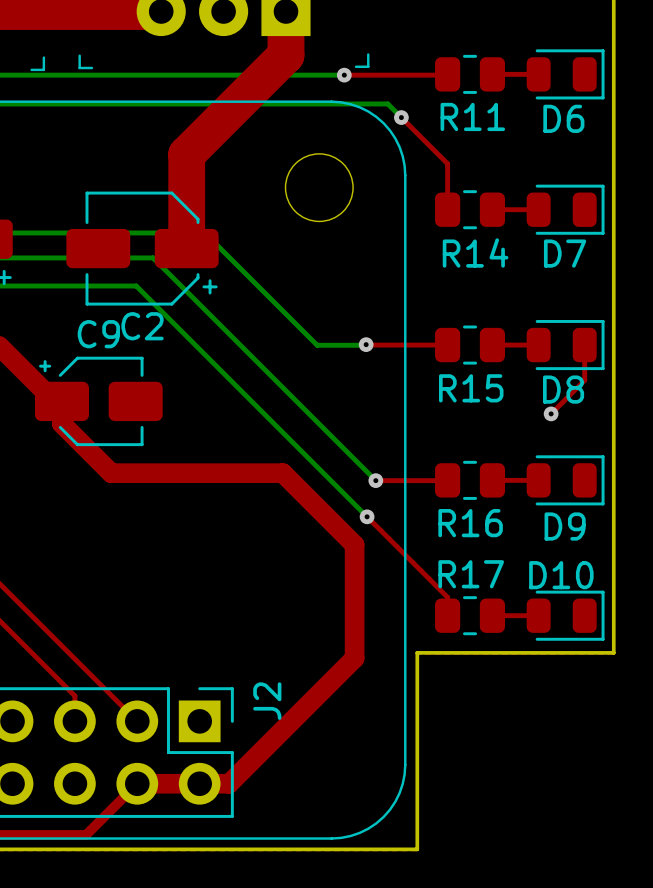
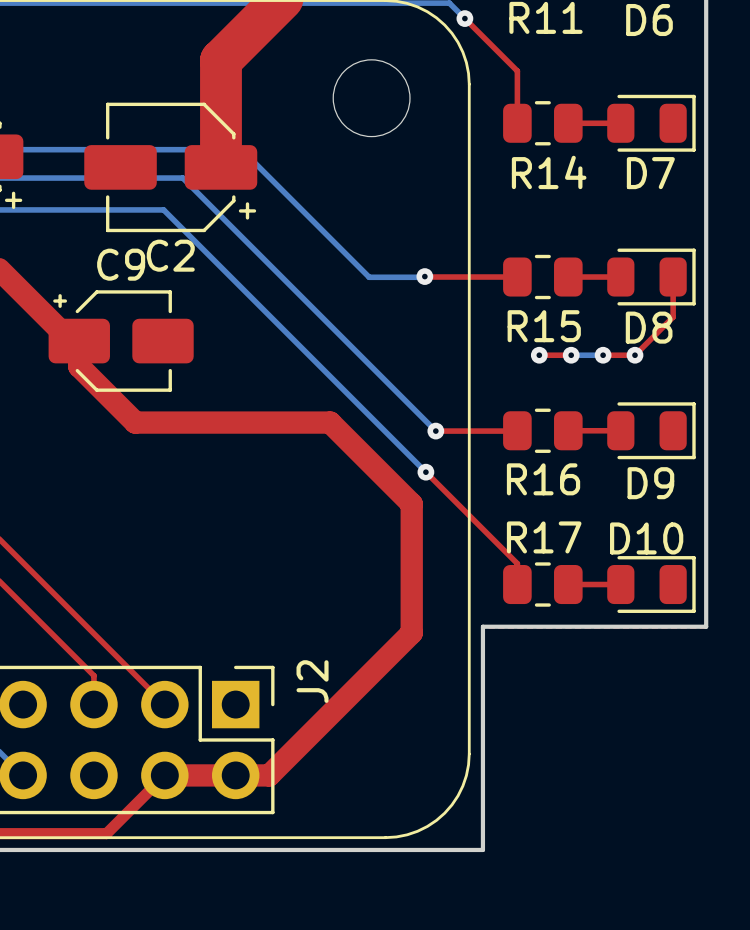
top track: none -> (539, 355) (571, 355)
via: none -> (539, 355)
bottom track: none -> (571, 355) (603, 355)
via: none -> (571, 355)
top track: none -> (603, 355) (634, 355)
via: none -> (603, 355)

